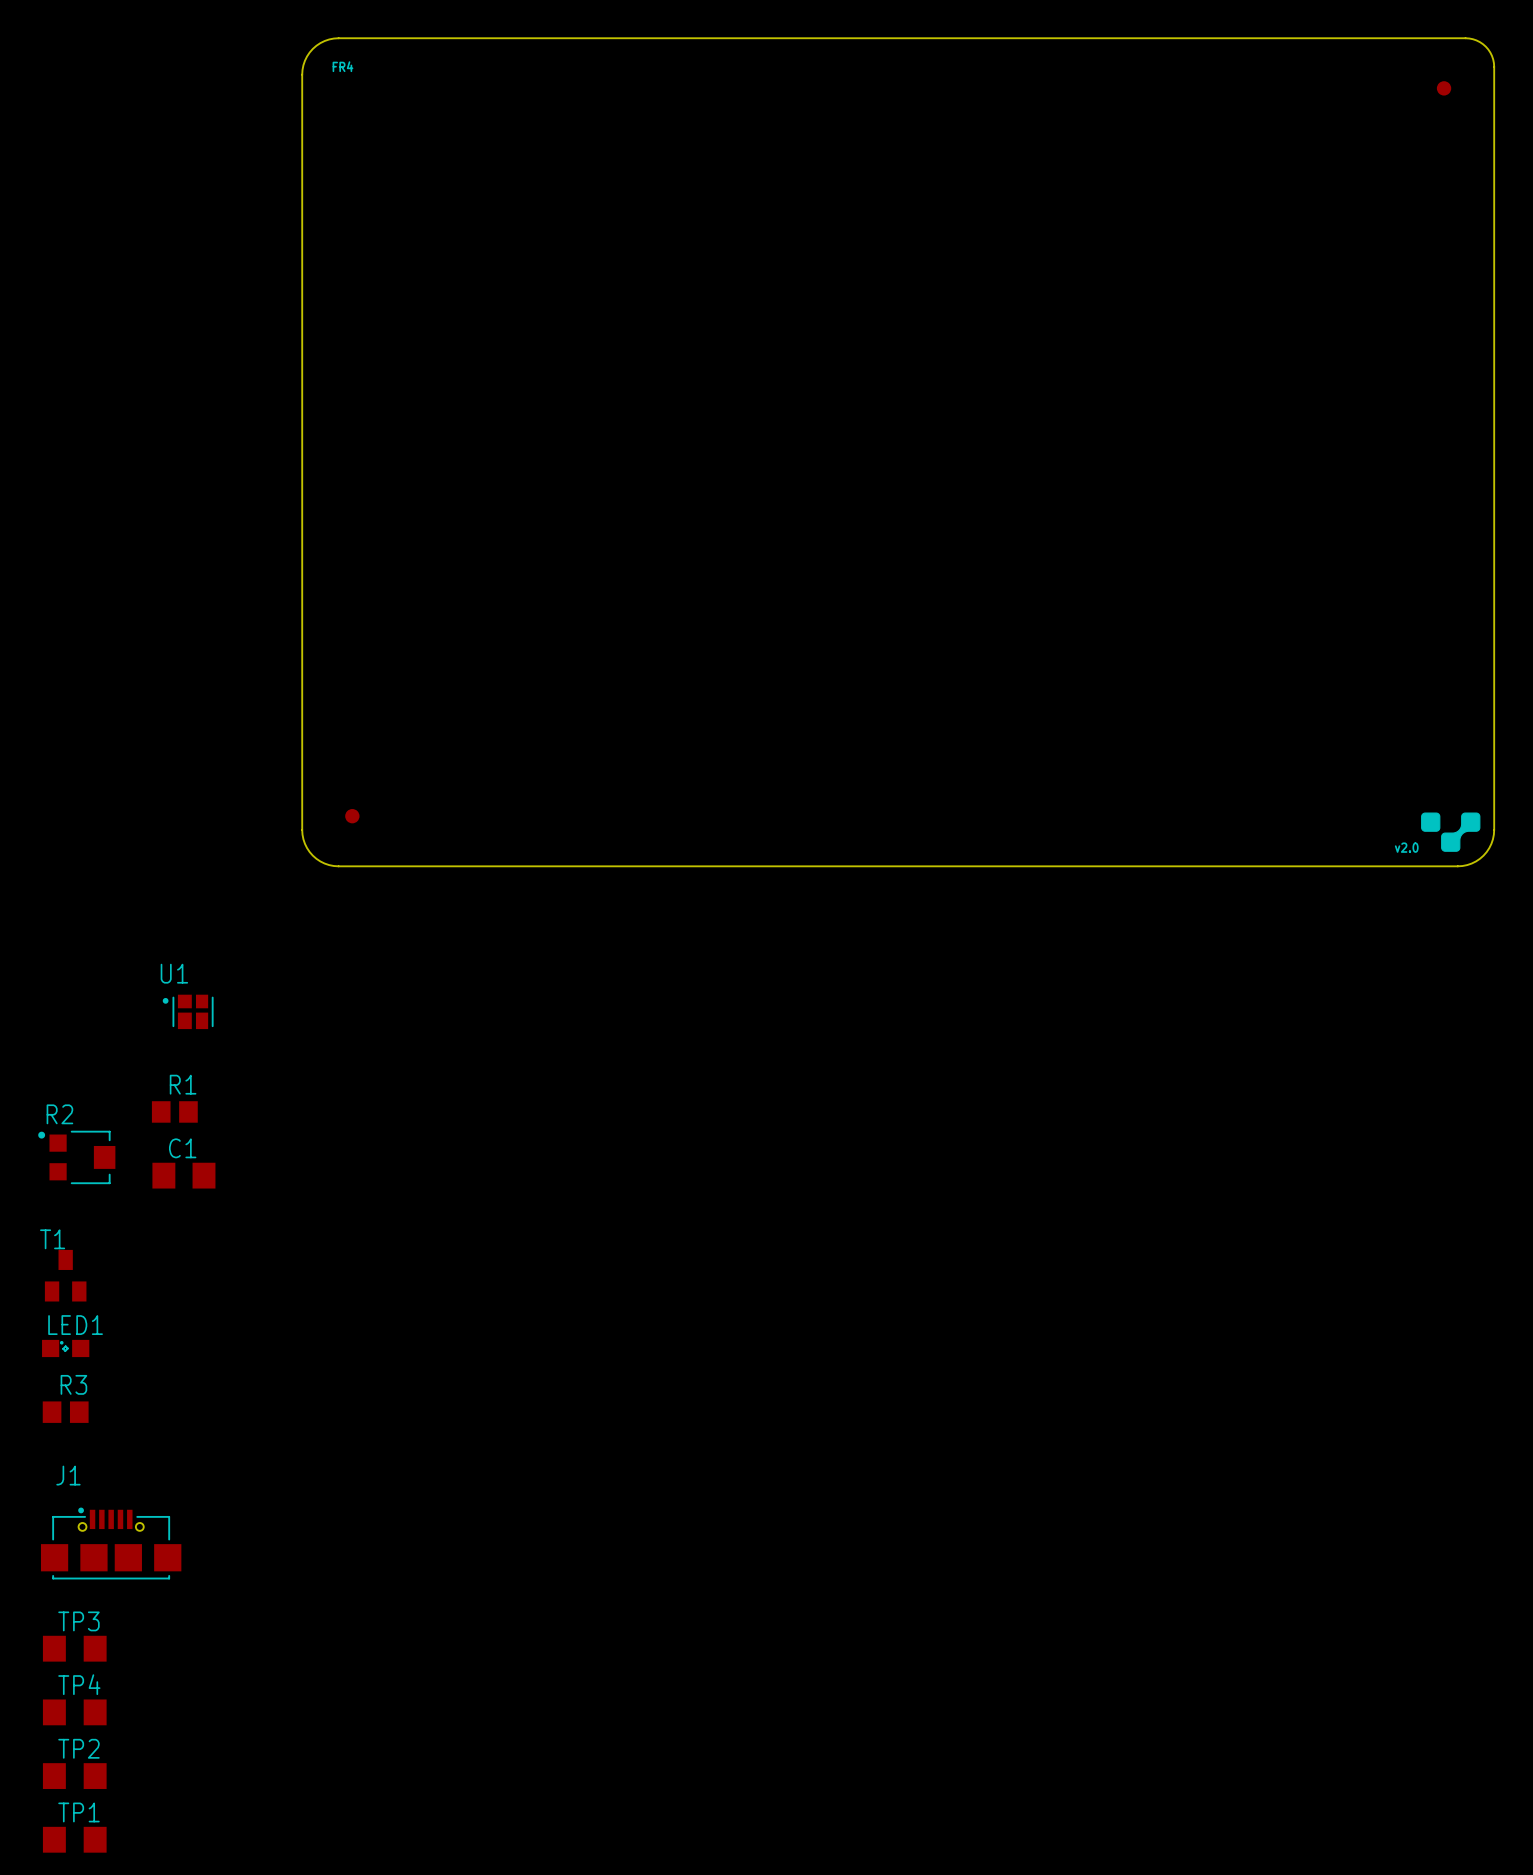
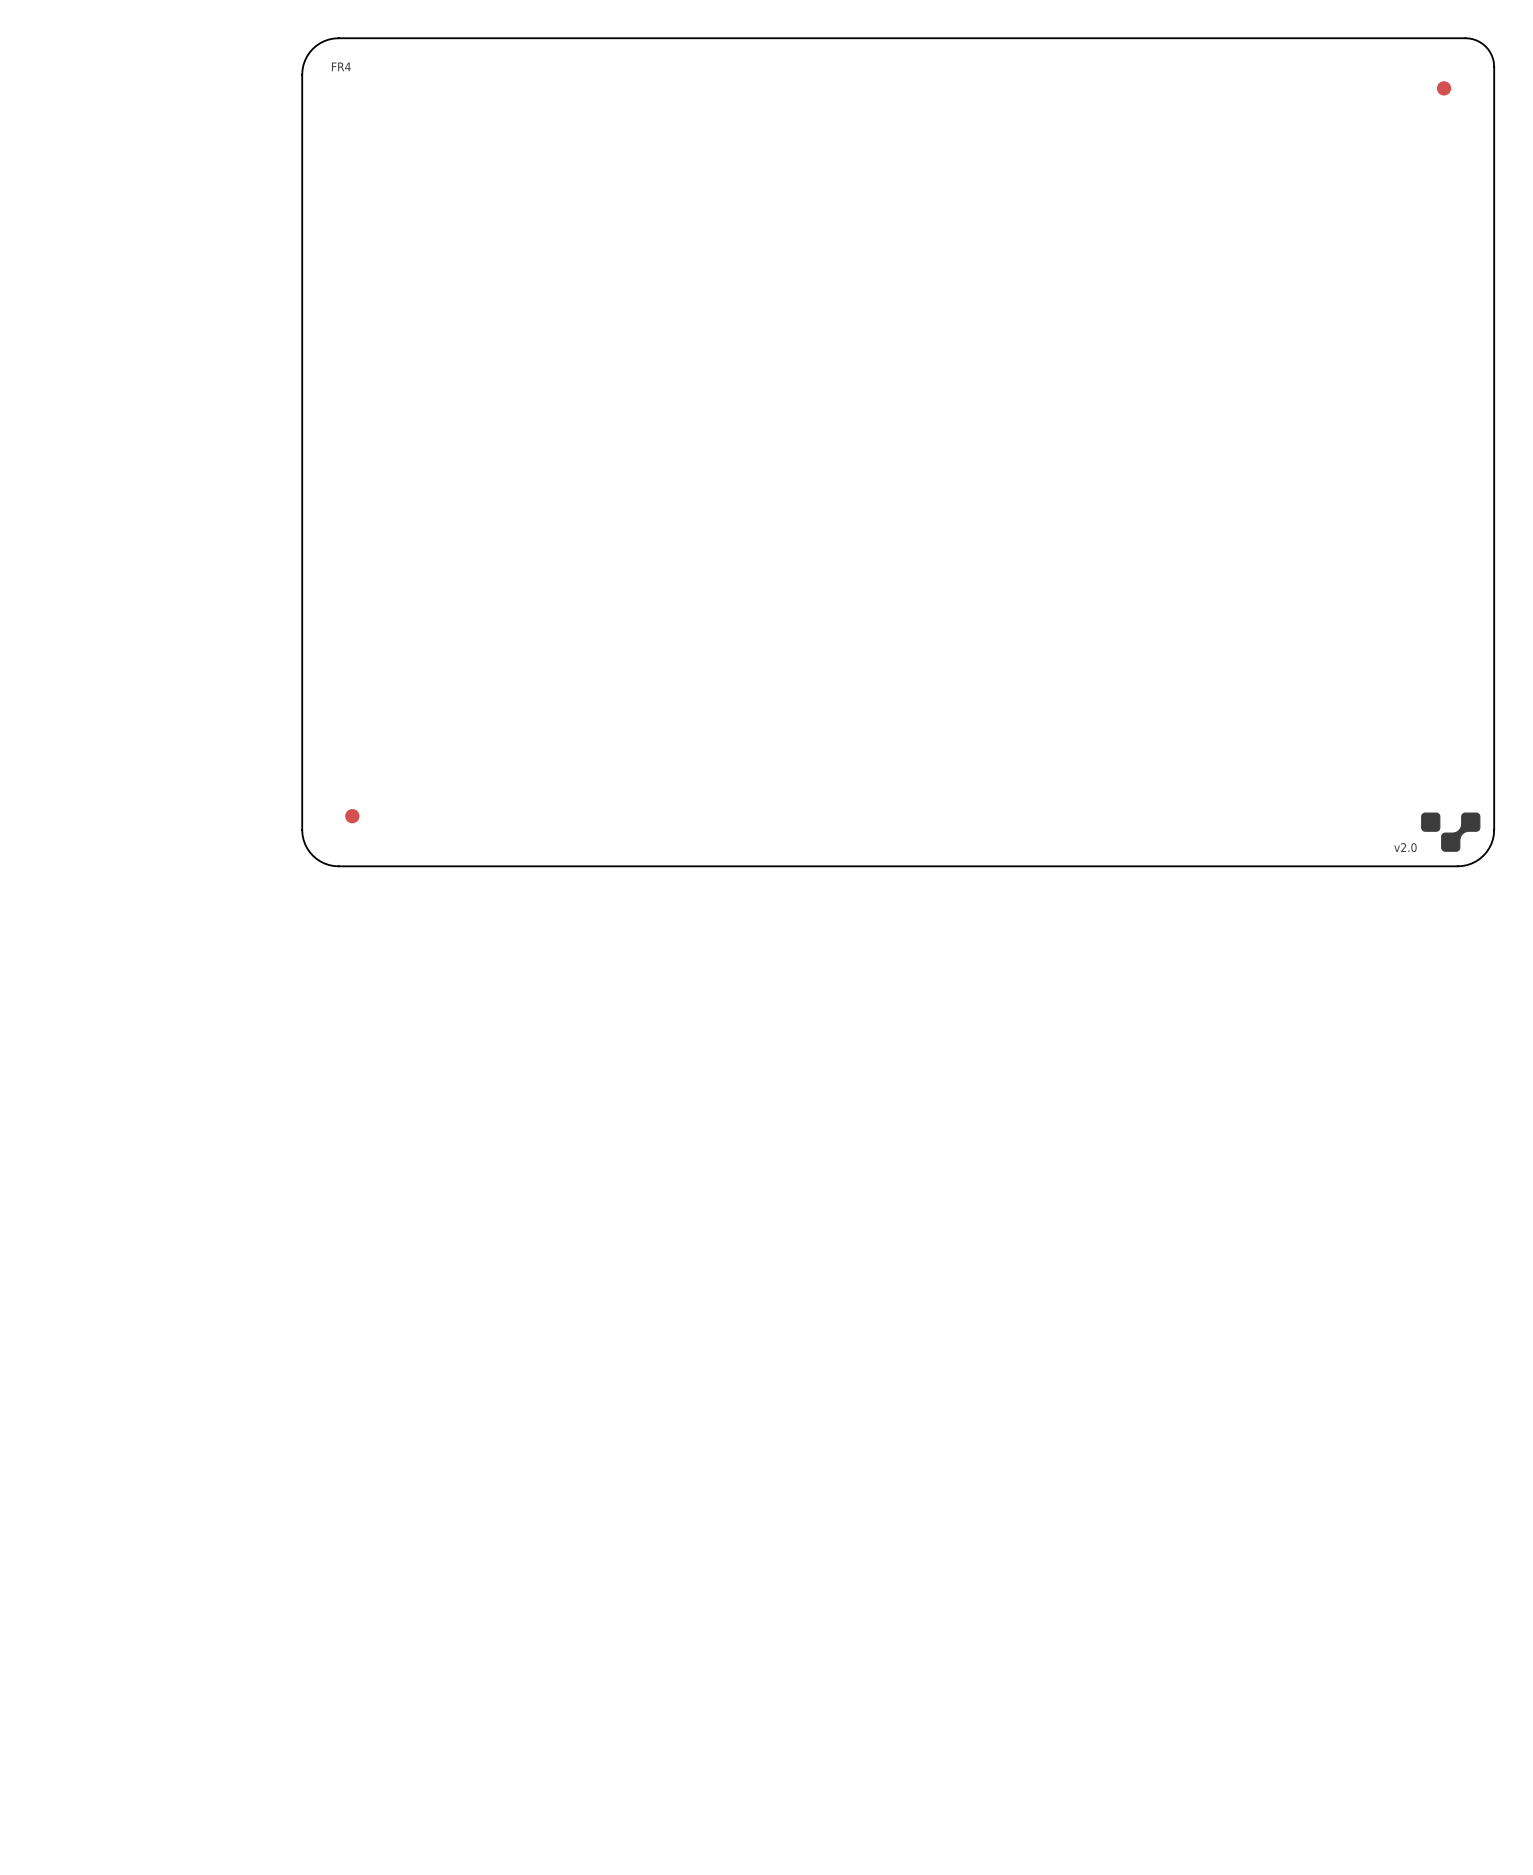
U1: (188, 1011) -> none
R1: (174, 1111) -> none
R2: (76, 1157) -> none
C1: (183, 1175) -> none
T1: (65, 1275) -> none
LED1: (65, 1348) -> none
R3: (65, 1412) -> none
J1: (111, 1543) -> none
TP3: (74, 1648) -> none
TP4: (74, 1712) -> none
TP2: (74, 1776) -> none
TP1: (74, 1839) -> none

